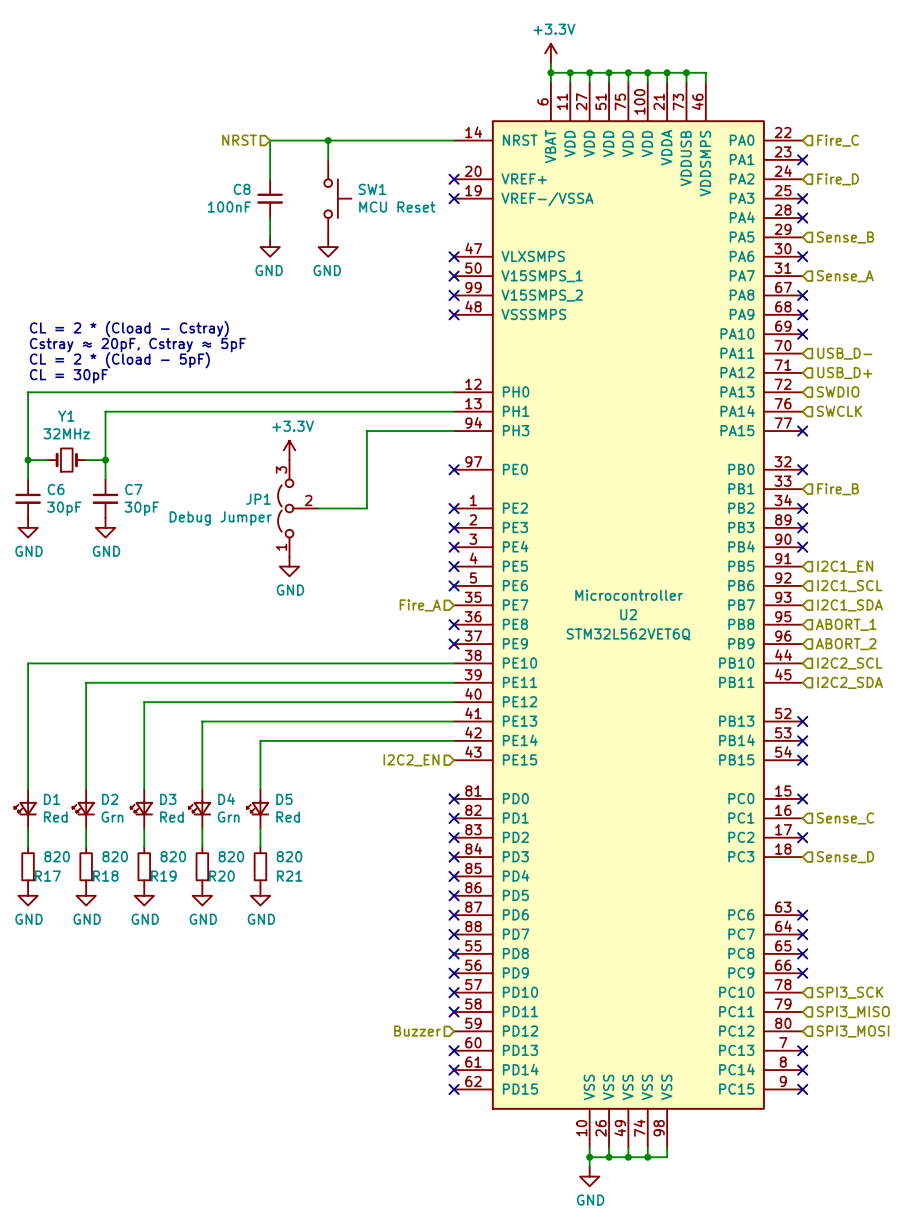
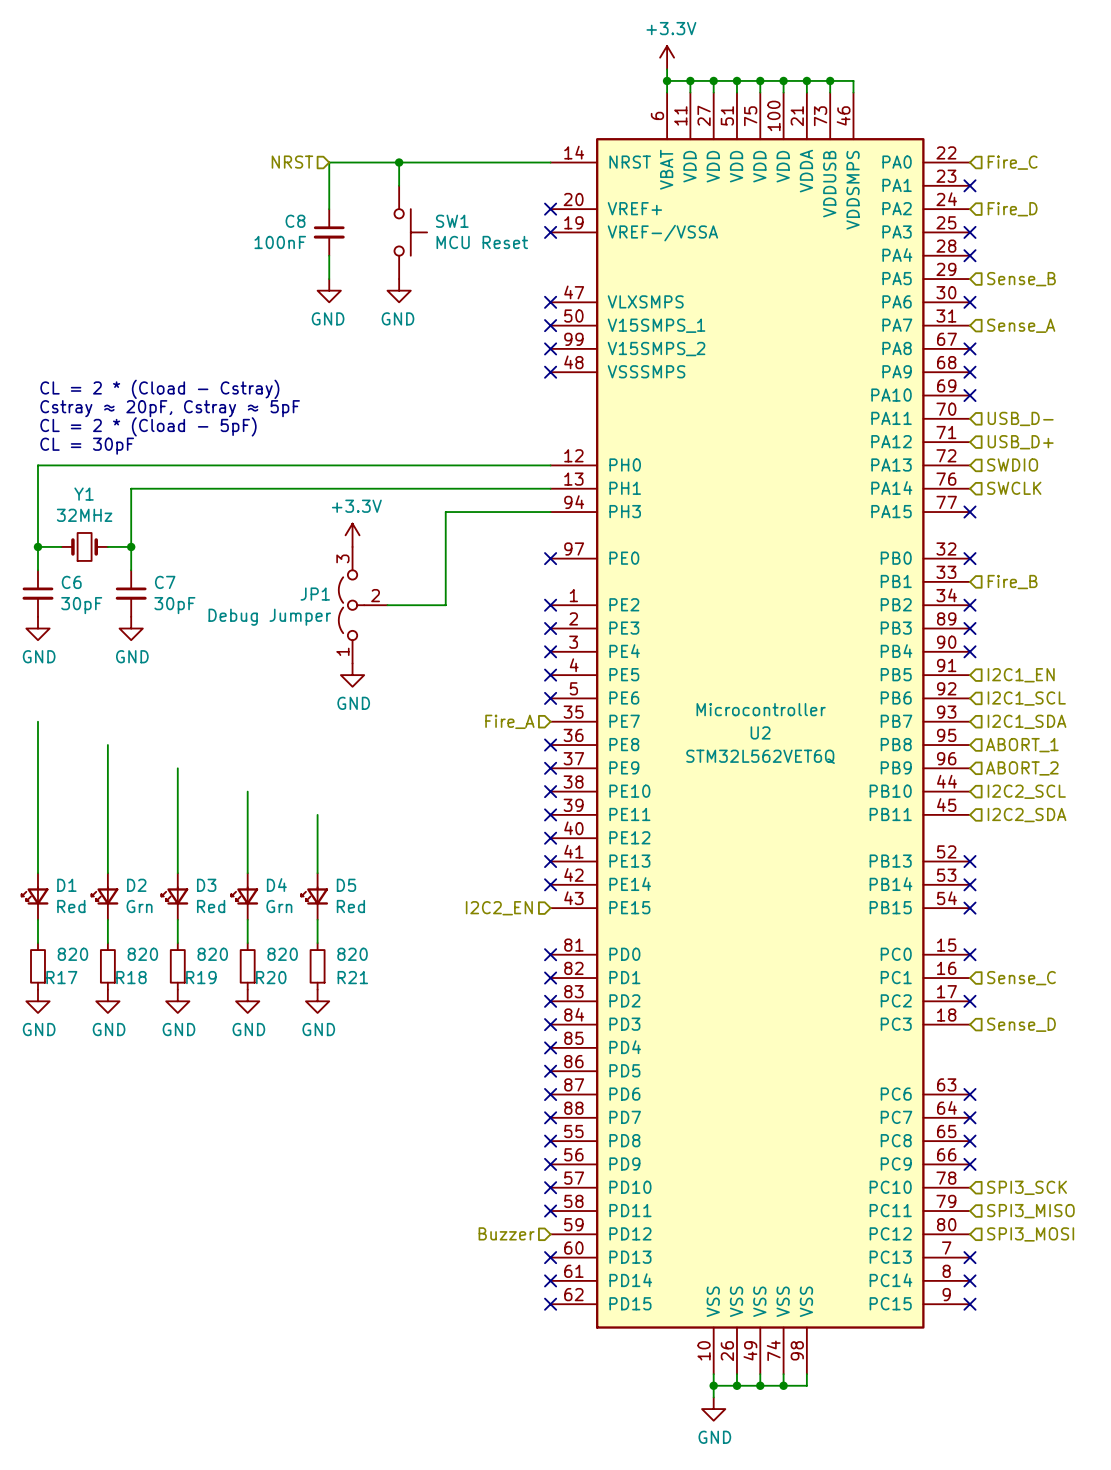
wire: (28, 663) (454, 663) -> (37, 791) (37, 721)
no-connect mark: none -> (550, 791)
wire: (86, 682) (454, 682) -> (107, 814) (107, 745)
wire: none -> (317, 814) (317, 873)
no-connect mark: none -> (550, 814)
wire: (144, 702) (454, 702) -> (177, 838) (177, 768)
no-connect mark: none -> (550, 838)
wire: (202, 721) (454, 721) -> (247, 861) (247, 791)
no-connect mark: none -> (550, 861)
wire: (454, 740) (260, 740) (260, 769) -> none
no-connect mark: none -> (550, 884)
D1 position: (25, 808) -> (35, 896)
D2 position: (83, 808) -> (104, 896)
D3 position: (141, 808) -> (174, 896)
D4 position: (199, 808) -> (244, 896)
D5 position: (258, 808) -> (314, 896)
power symbol: none -> GND (37, 1001)
power symbol: none -> GND (107, 1001)
power symbol: none -> GND (177, 1001)
power symbol: none -> GND (247, 1001)
power symbol: none -> GND (317, 1001)
R17 position: (28, 866) -> (37, 966)
R18 position: (86, 866) -> (107, 966)
R19 position: (144, 866) -> (177, 966)
R20 position: (202, 866) -> (247, 966)
R21 position: (260, 866) -> (317, 966)
power symbol: GND (28, 895) -> none
power symbol: GND (86, 895) -> none
power symbol: GND (144, 895) -> none
power symbol: GND (202, 895) -> none
power symbol: GND (260, 895) -> none

